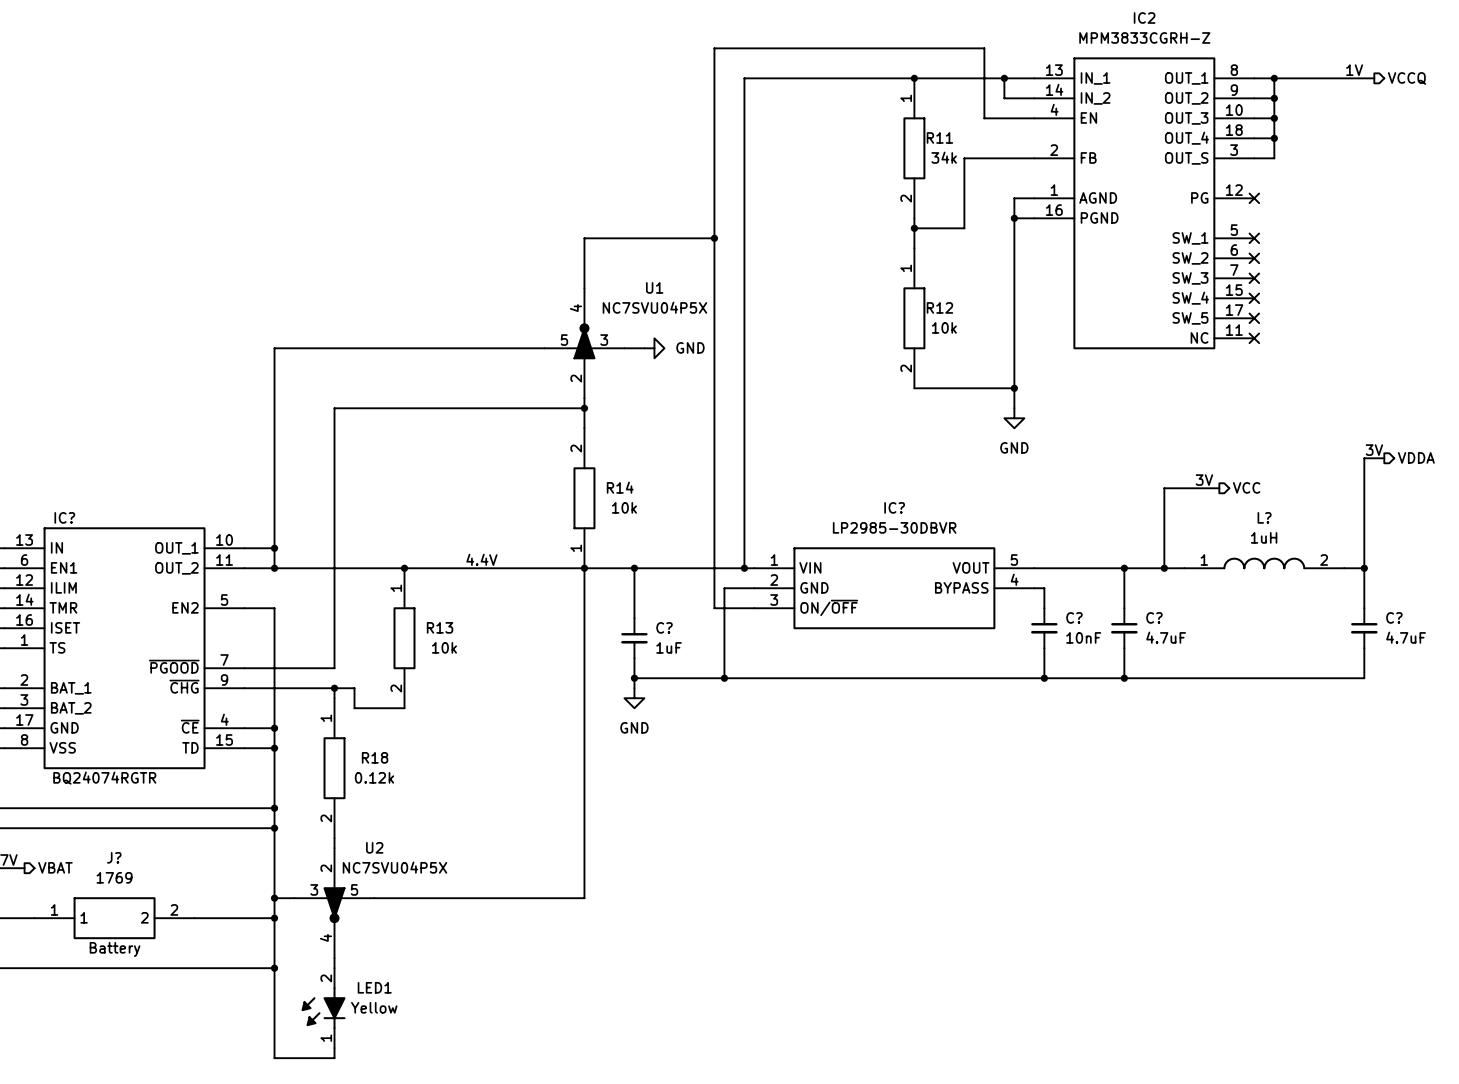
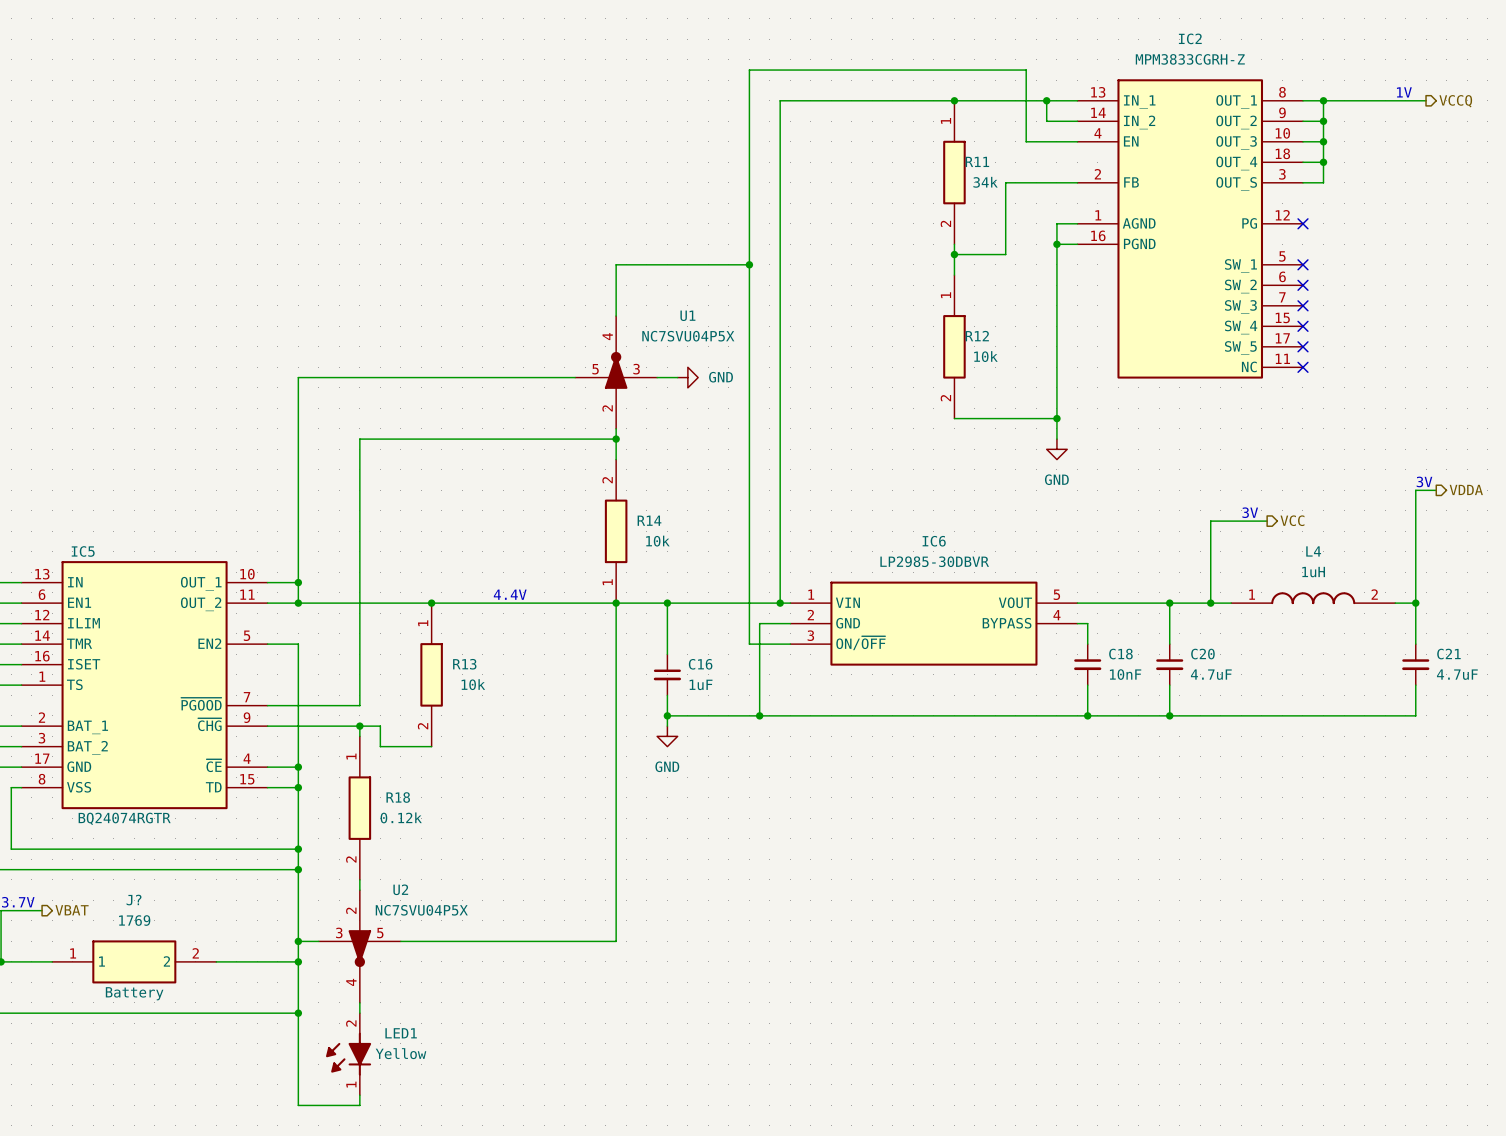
IC? name: IC? (894, 507) -> IC6 (934, 541)
IC? name: IC? (64, 517) -> IC5 (83, 551)
L? name: L? (1264, 517) -> L4 (1313, 551)
C? name: C? (1074, 617) -> C18 (1120, 654)
C? name: C? (1154, 617) -> C20 (1202, 654)
C? name: C? (1394, 617) -> C21 (1448, 654)
C? name: C? (664, 627) -> C16 (700, 664)

